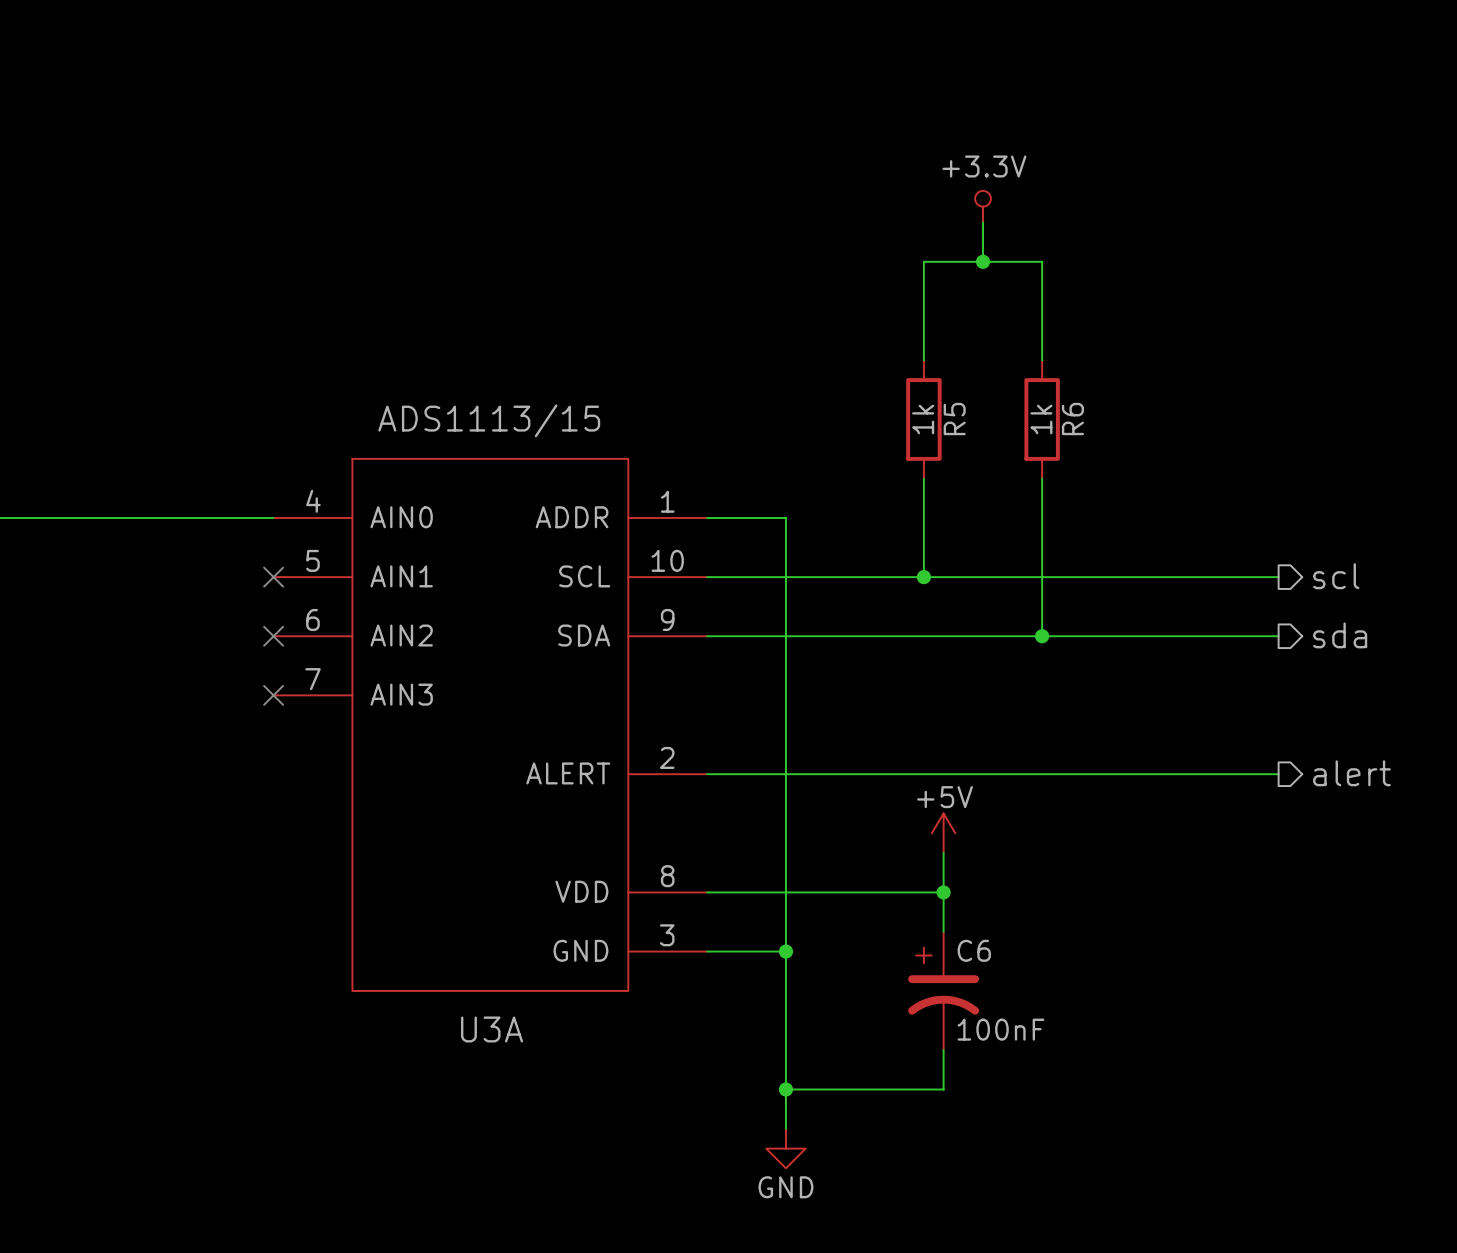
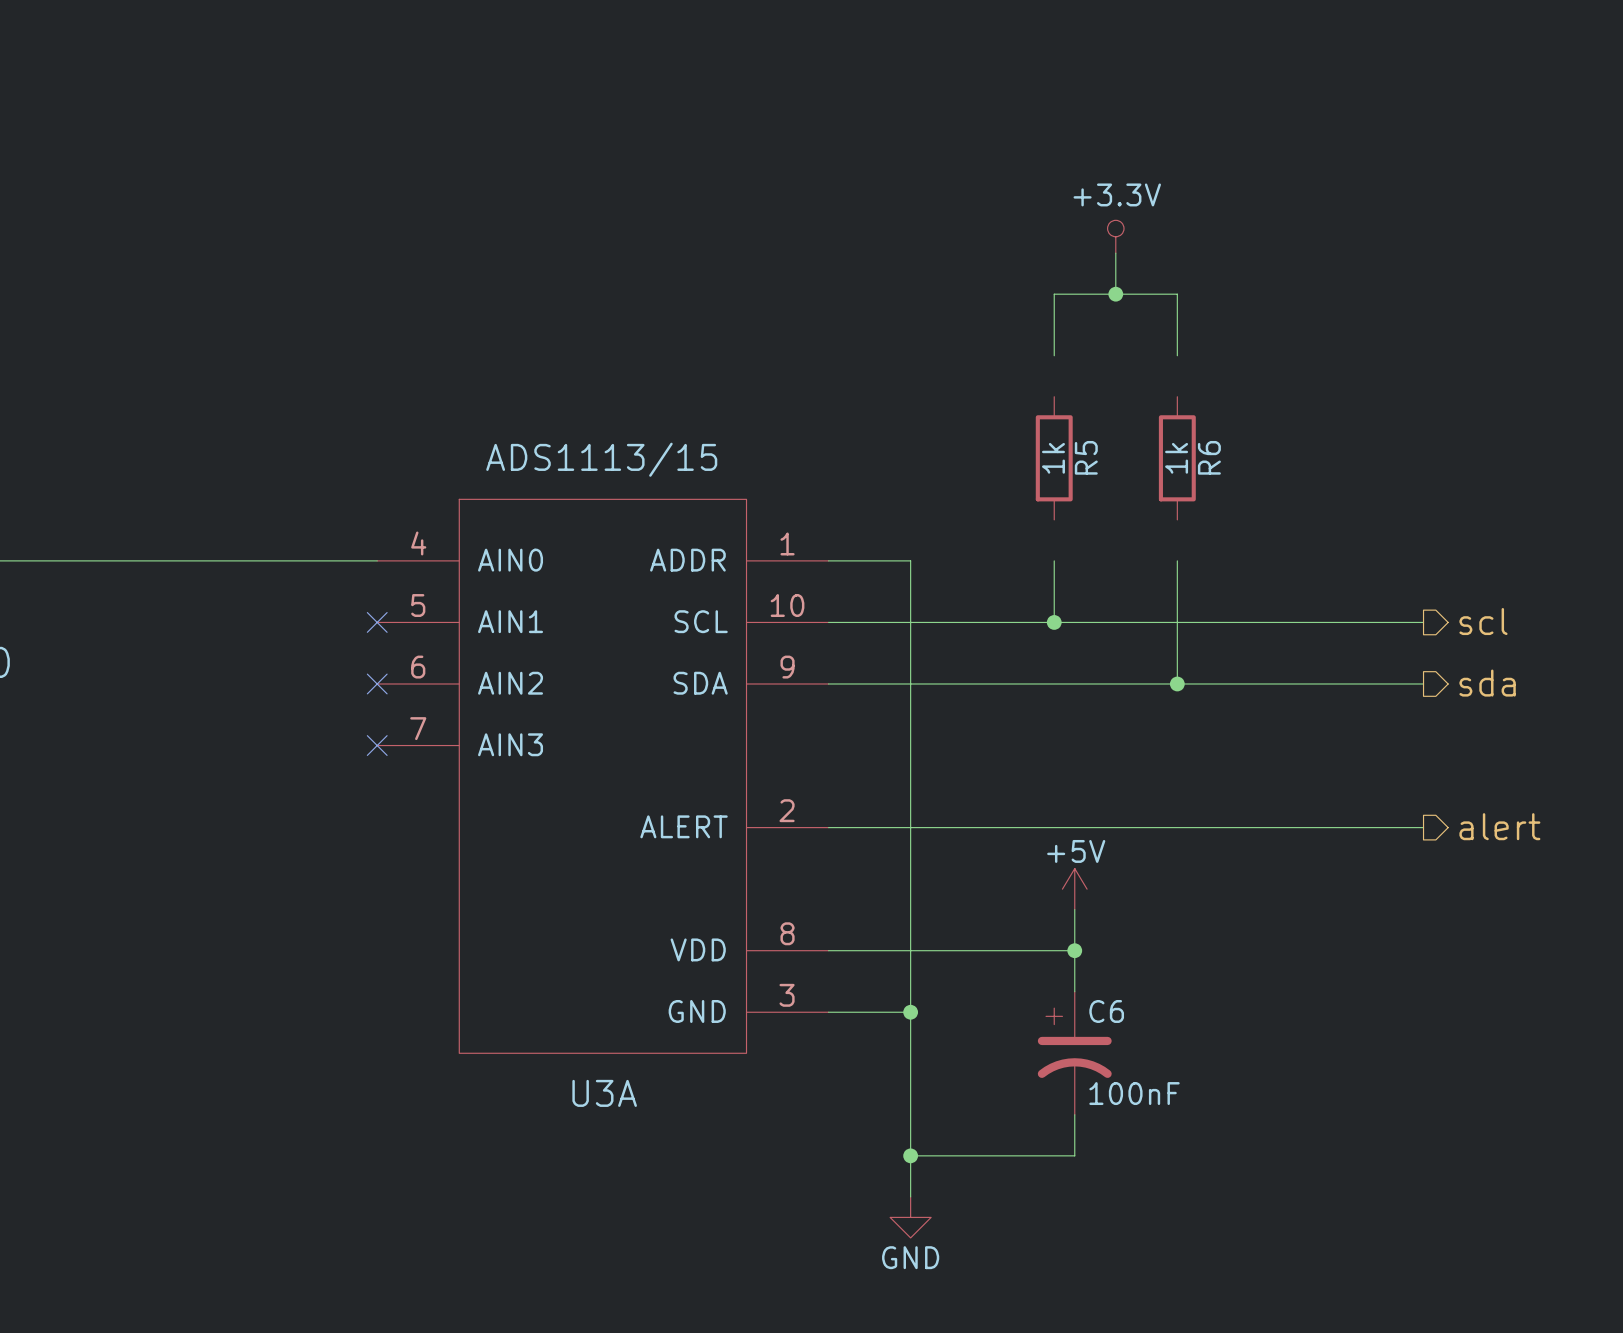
wire: (923, 320) (923, 360) -> none
wire: (1042, 320) (1042, 360) -> none
wire: (923, 478) (923, 518) -> none
wire: (1042, 478) (1042, 518) -> none

